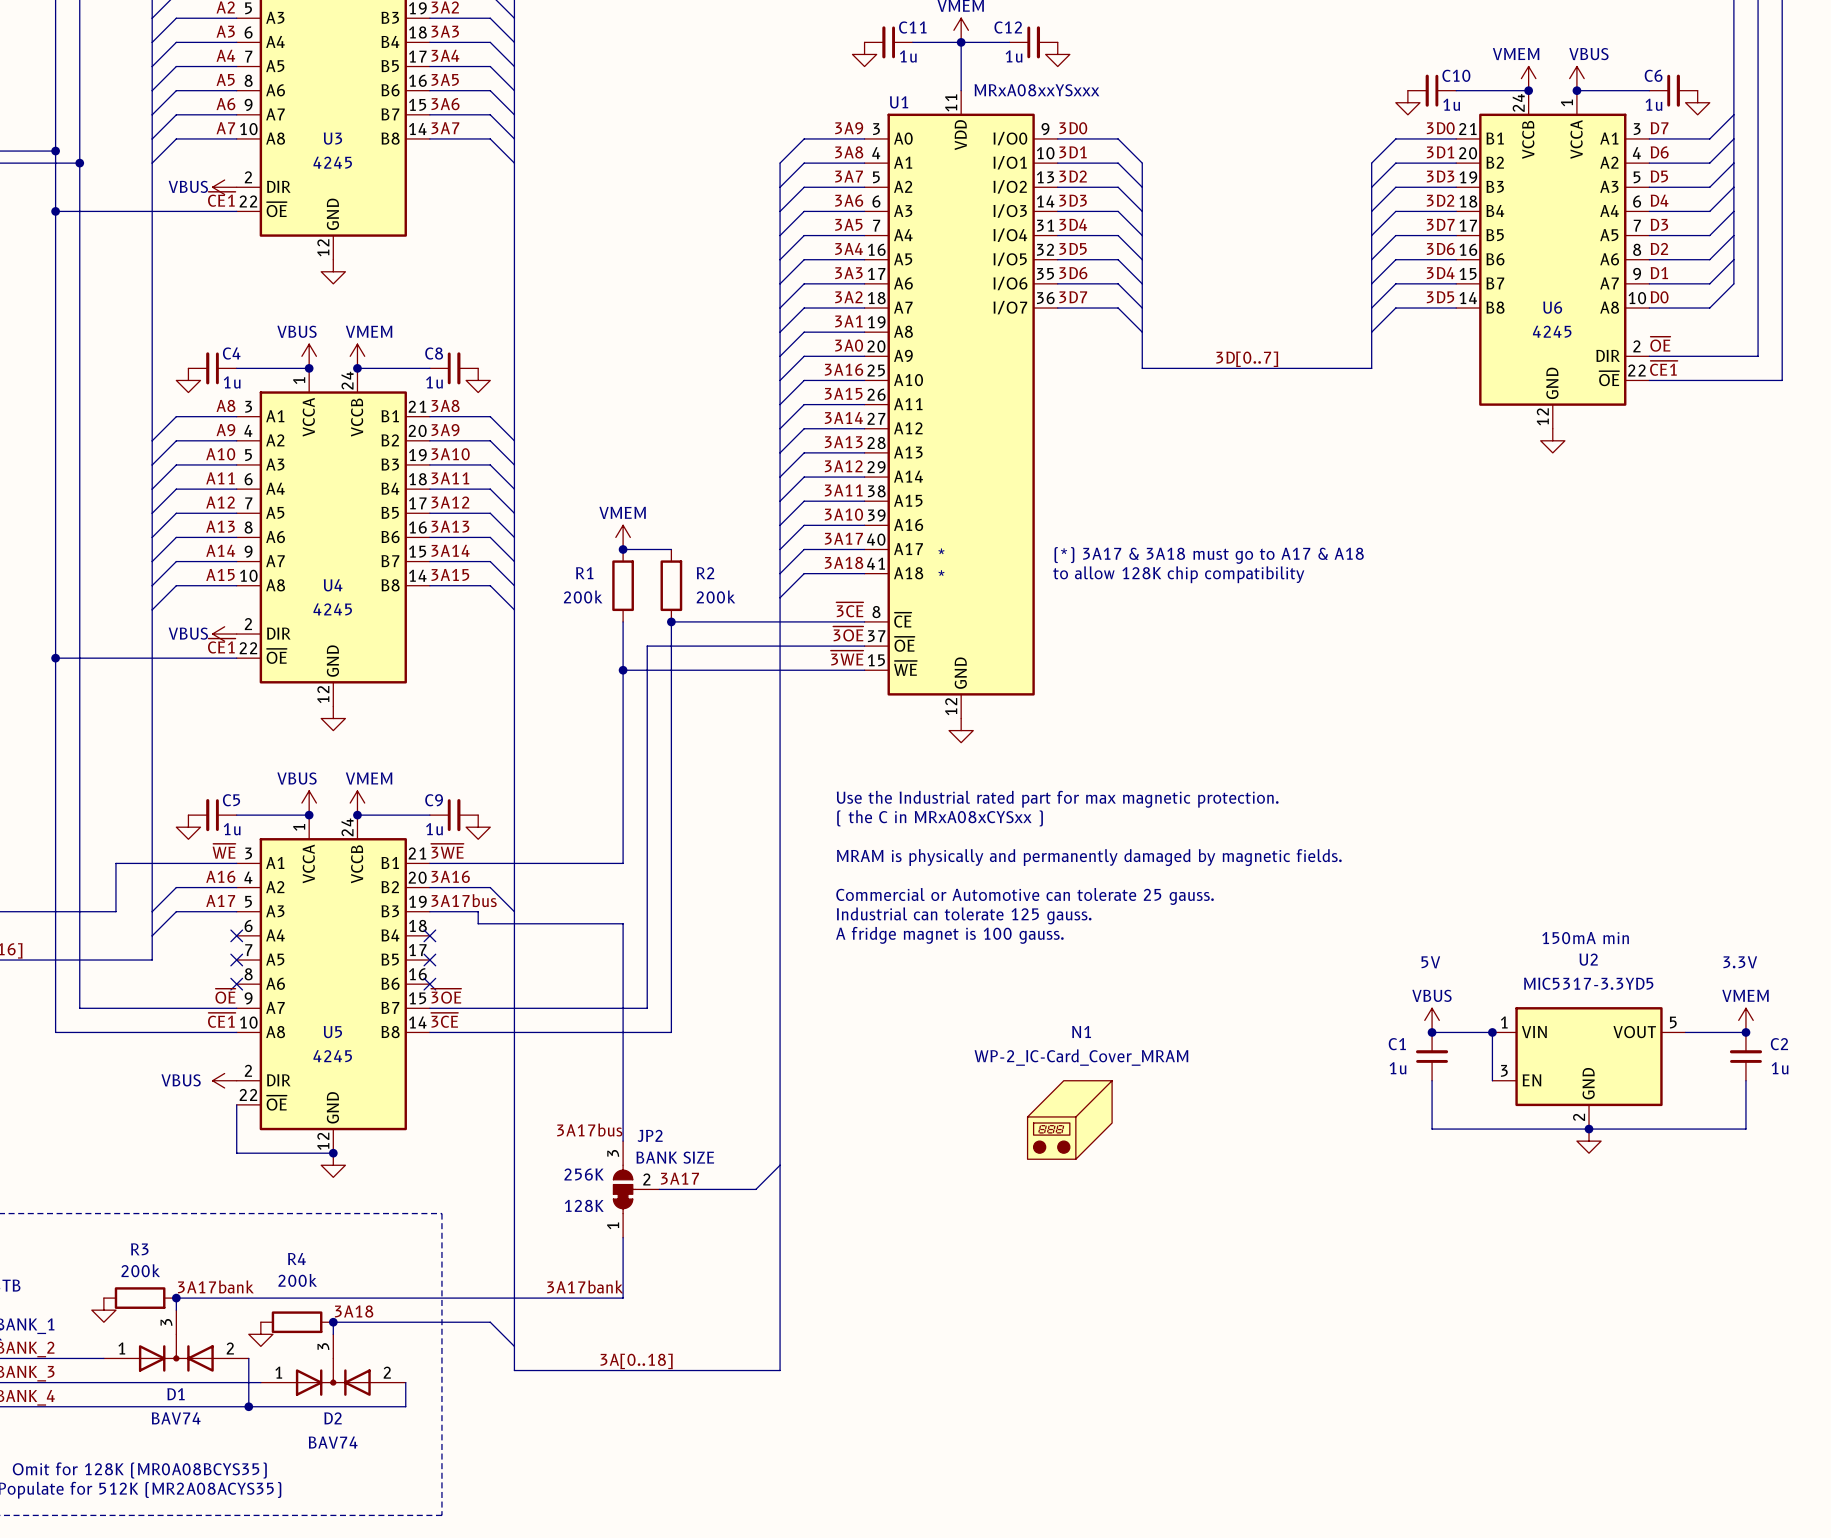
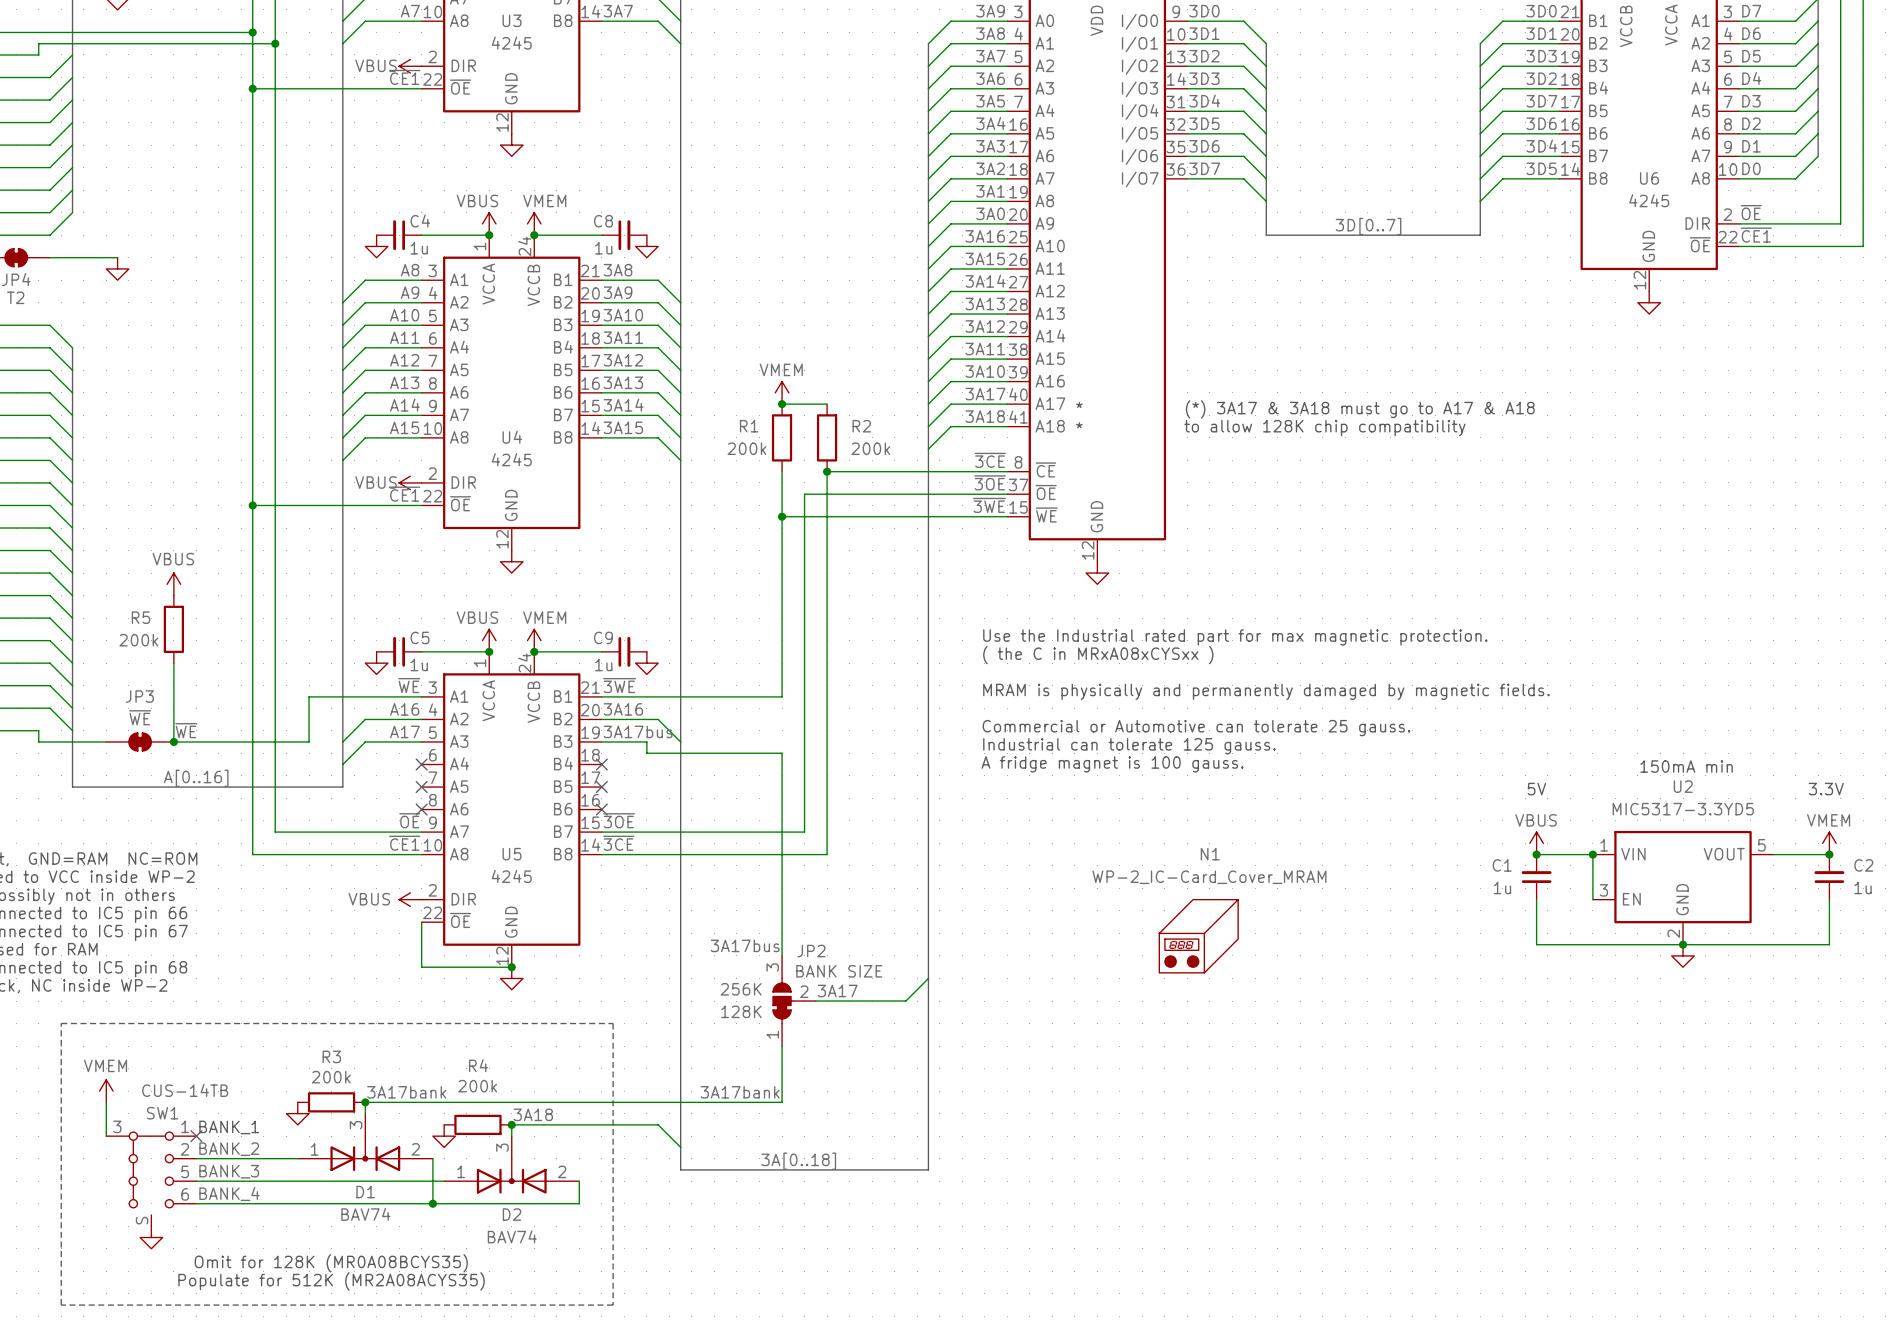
JP2 text: 256K (584, 1174) -> none
JP2 text: none -> 256K (741, 989)
JP2 text: none -> 128K (741, 1011)
JP2 text: 128K (584, 1205) -> none

